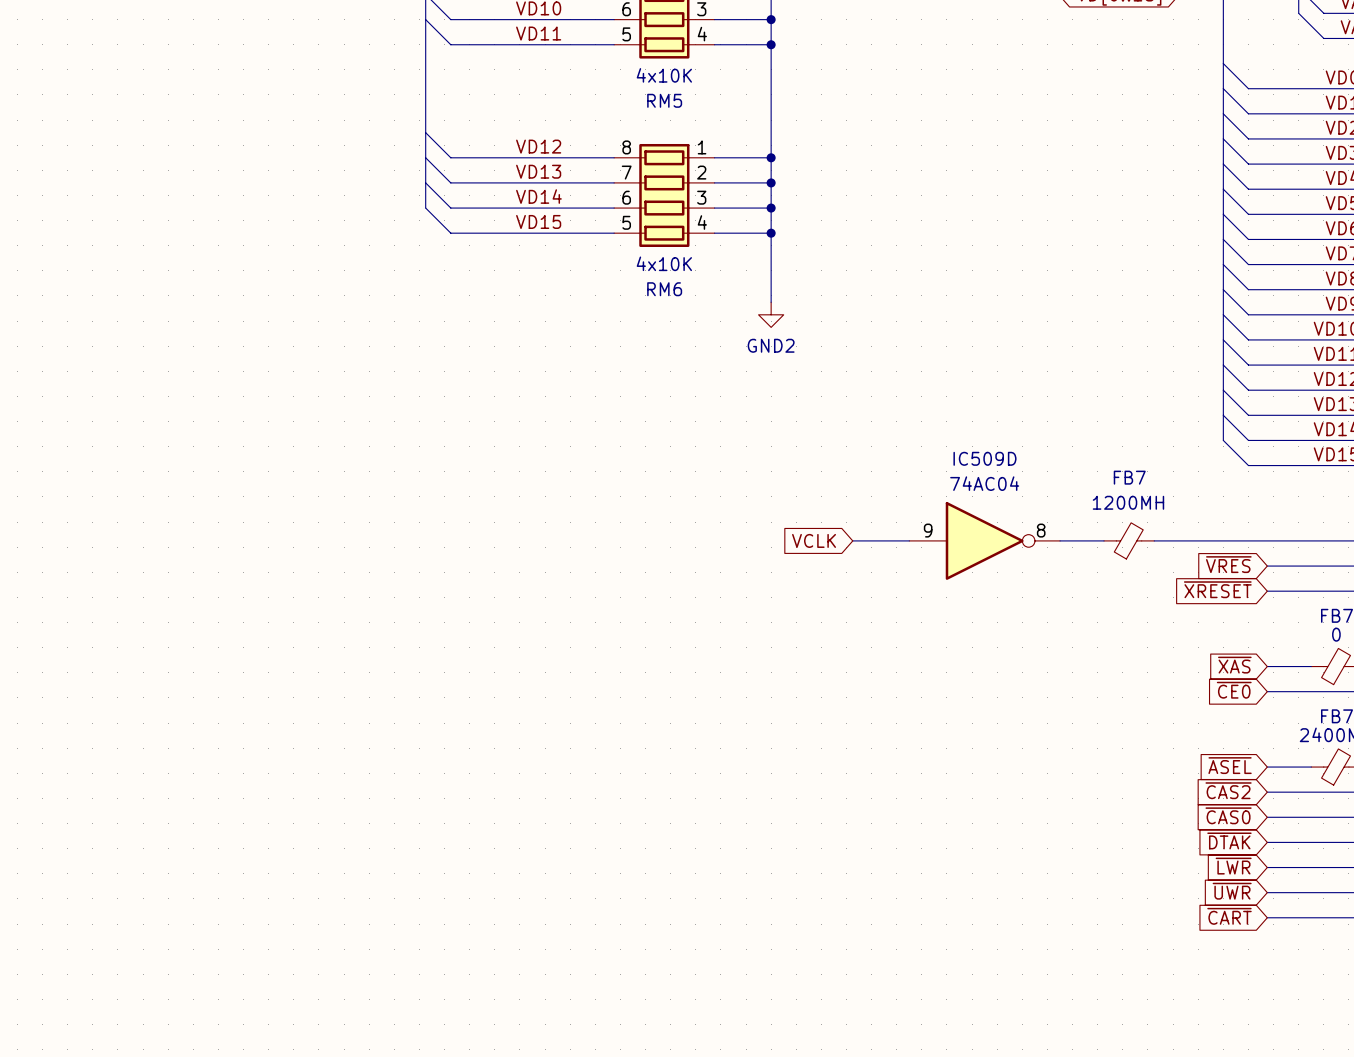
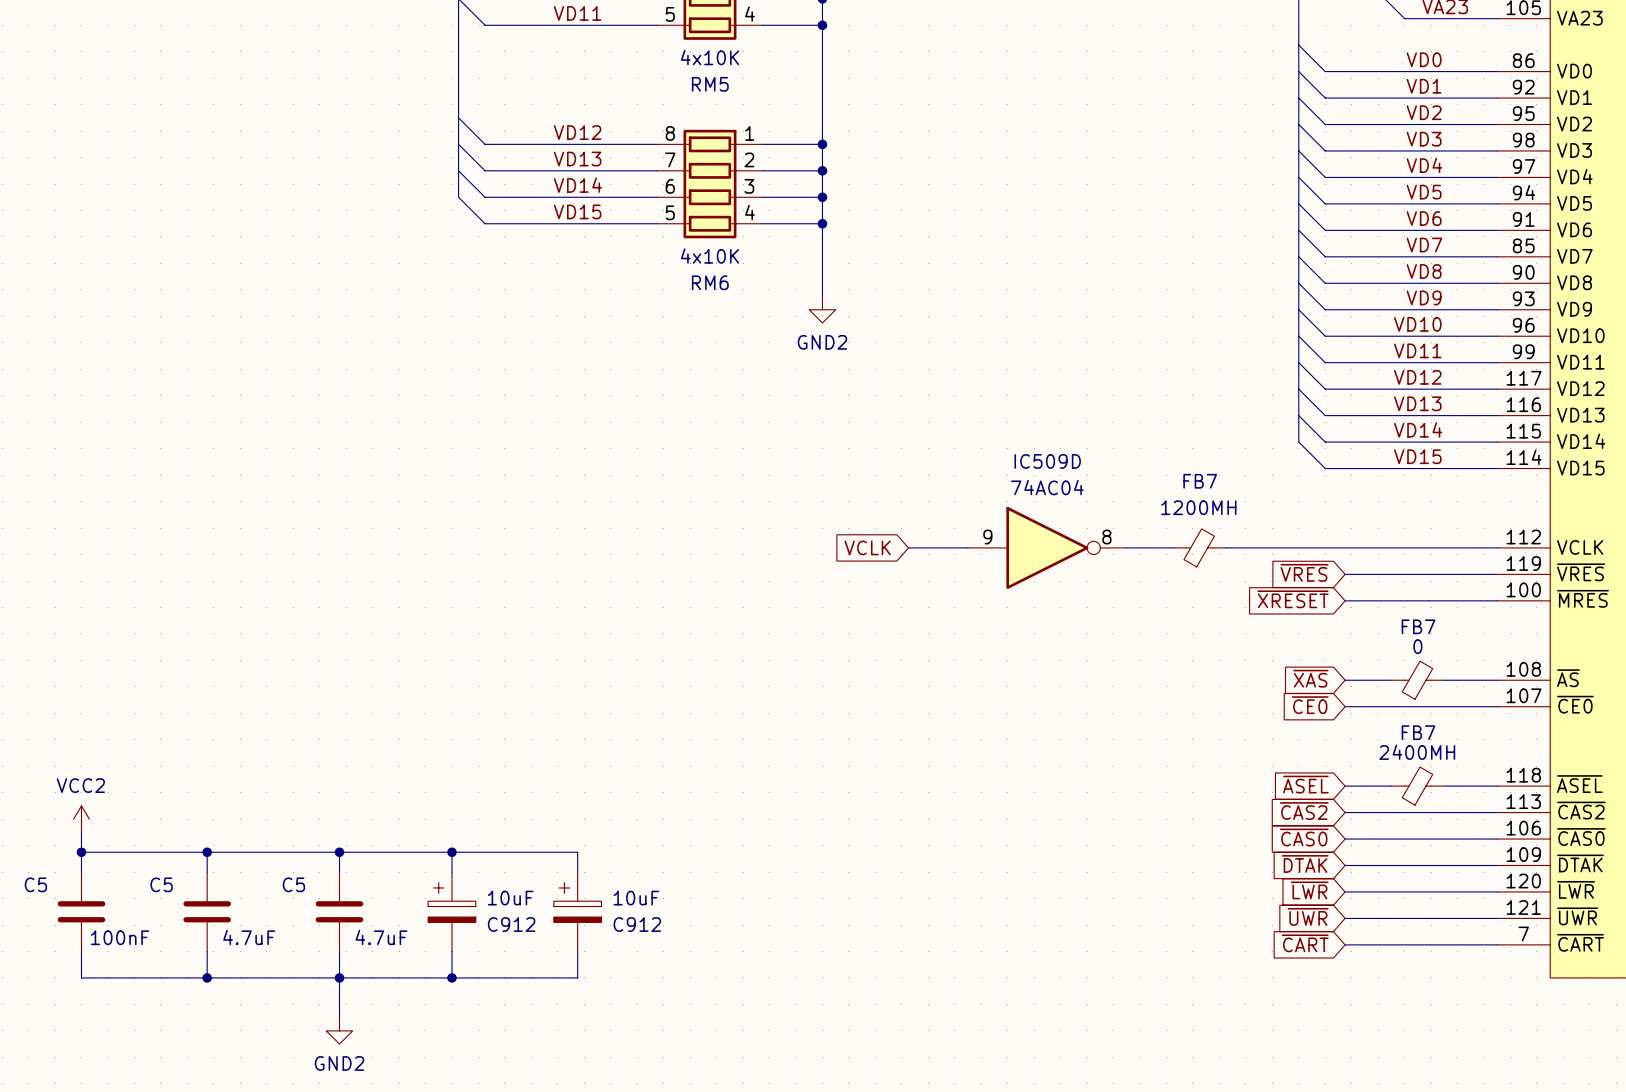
power symbol: none -> VCC2 (81, 819)
wire: none -> (81, 832) (81, 872)
wire: none -> (81, 852) (577, 852) (577, 872)
junction: none -> (81, 852)
wire: none -> (207, 852) (207, 872)
junction: none -> (207, 852)
wire: none -> (339, 852) (339, 872)
junction: none -> (339, 852)
wire: none -> (451, 852) (451, 872)
junction: none -> (451, 852)
C5: none -> 100nF (81, 911)
C5: none -> 4.7uF (207, 911)
C5: none -> 4.7uF (339, 911)
C912: none -> 10uF (451, 911)
C912: none -> 10uF (577, 911)
wire: none -> (81, 951) (81, 977) (577, 977) (577, 951)
wire: none -> (207, 951) (207, 977)
wire: none -> (339, 951) (339, 1017)
wire: none -> (451, 951) (451, 977)
junction: none -> (207, 977)
junction: none -> (339, 977)
junction: none -> (451, 977)
power symbol: none -> GND2 (339, 1030)

